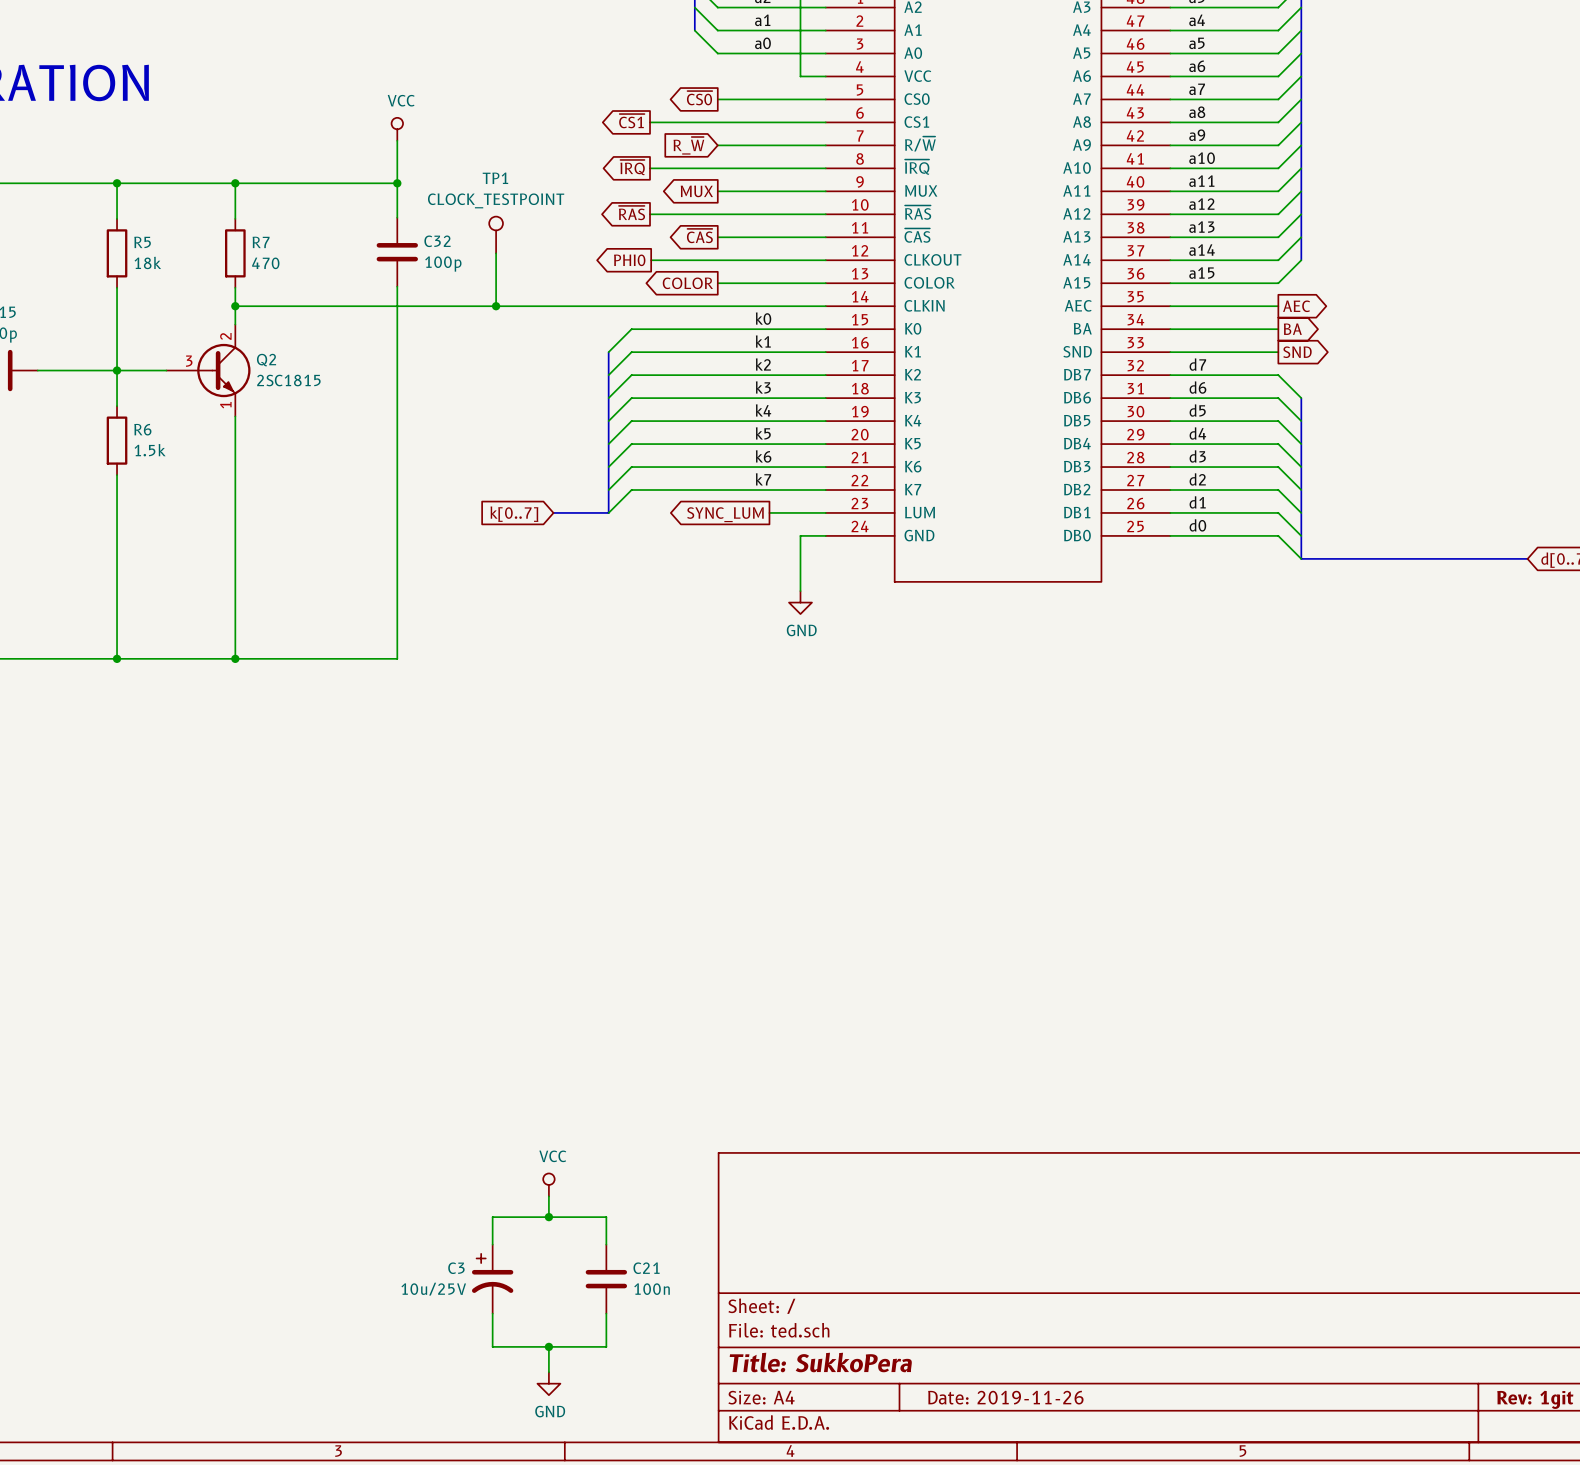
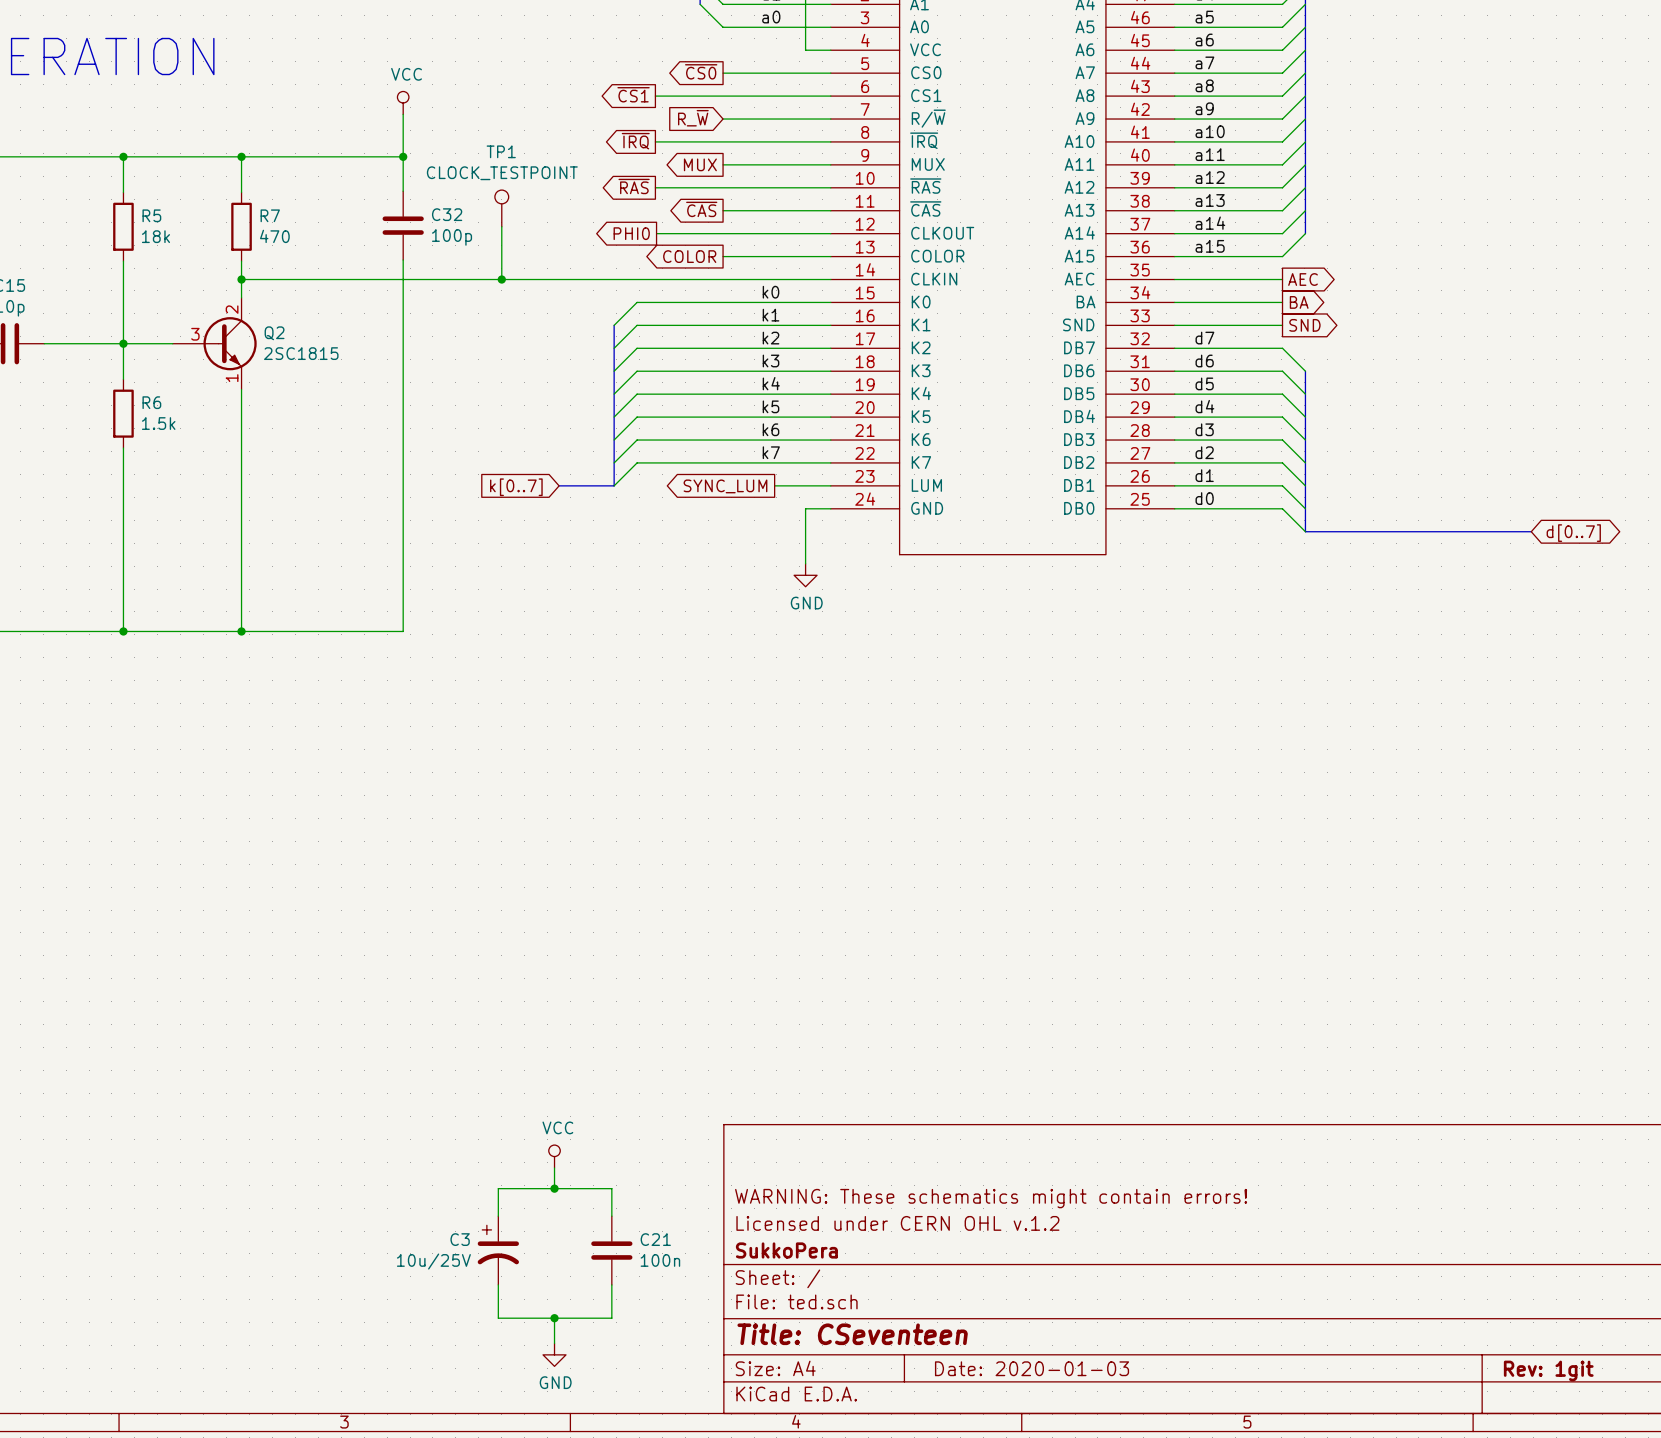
title block: none -> WARNING: These schematics might contain errors! (991, 1198)
title block: none -> Licensed under CERN OHL v.1.2 (897, 1223)
title block: none -> SukkoPera (786, 1250)
title block: Title: SukkoPera (820, 1362) -> Title: CSeventeen (852, 1334)
title block: Date: 2019-11-26 (1005, 1397) -> Date: 2020-01-03 (1032, 1368)

